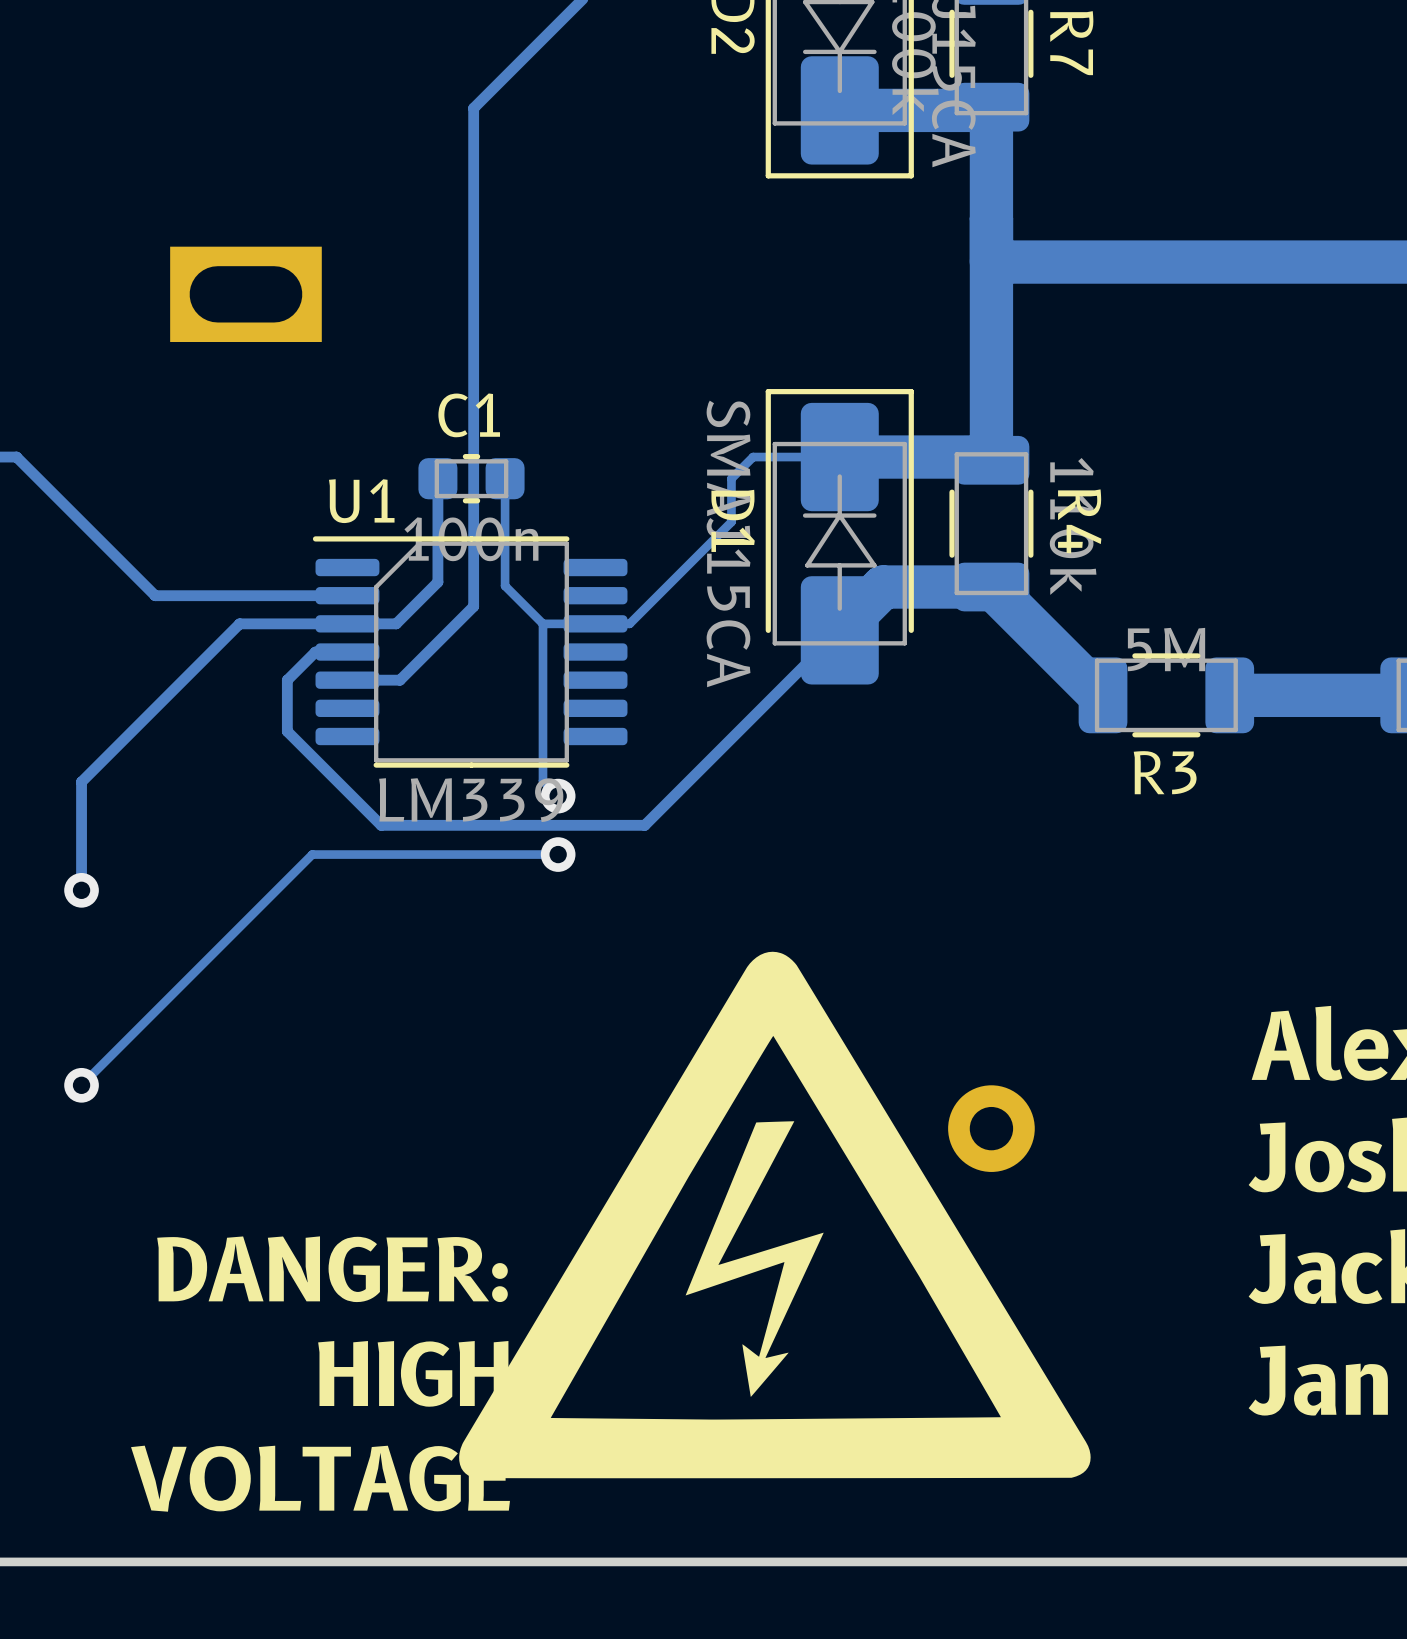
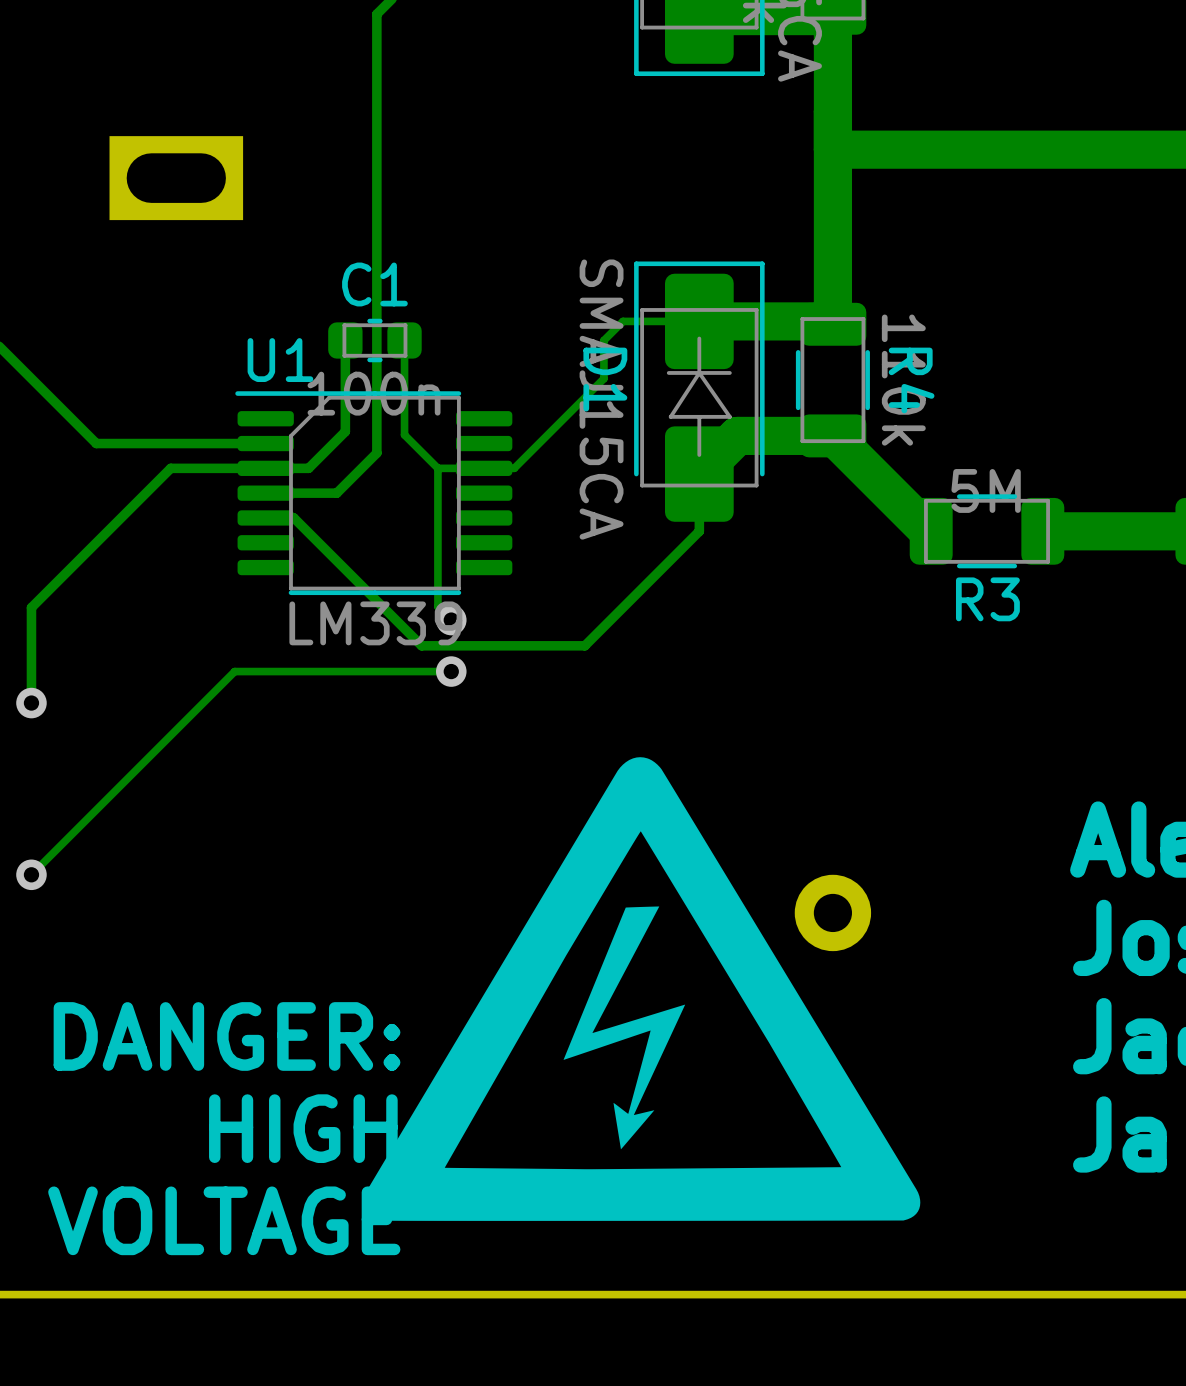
track: (839, 630) (644, 825) -> (699, 474) (699, 531) (584, 645) (527, 645)
track: (347, 652) (315, 652) (287, 680) (287, 731) (381, 825) (524, 825) -> (293, 517) (421, 645)
track: (428, 652) (400, 680) (379, 680) -> (336, 493) (265, 493)

